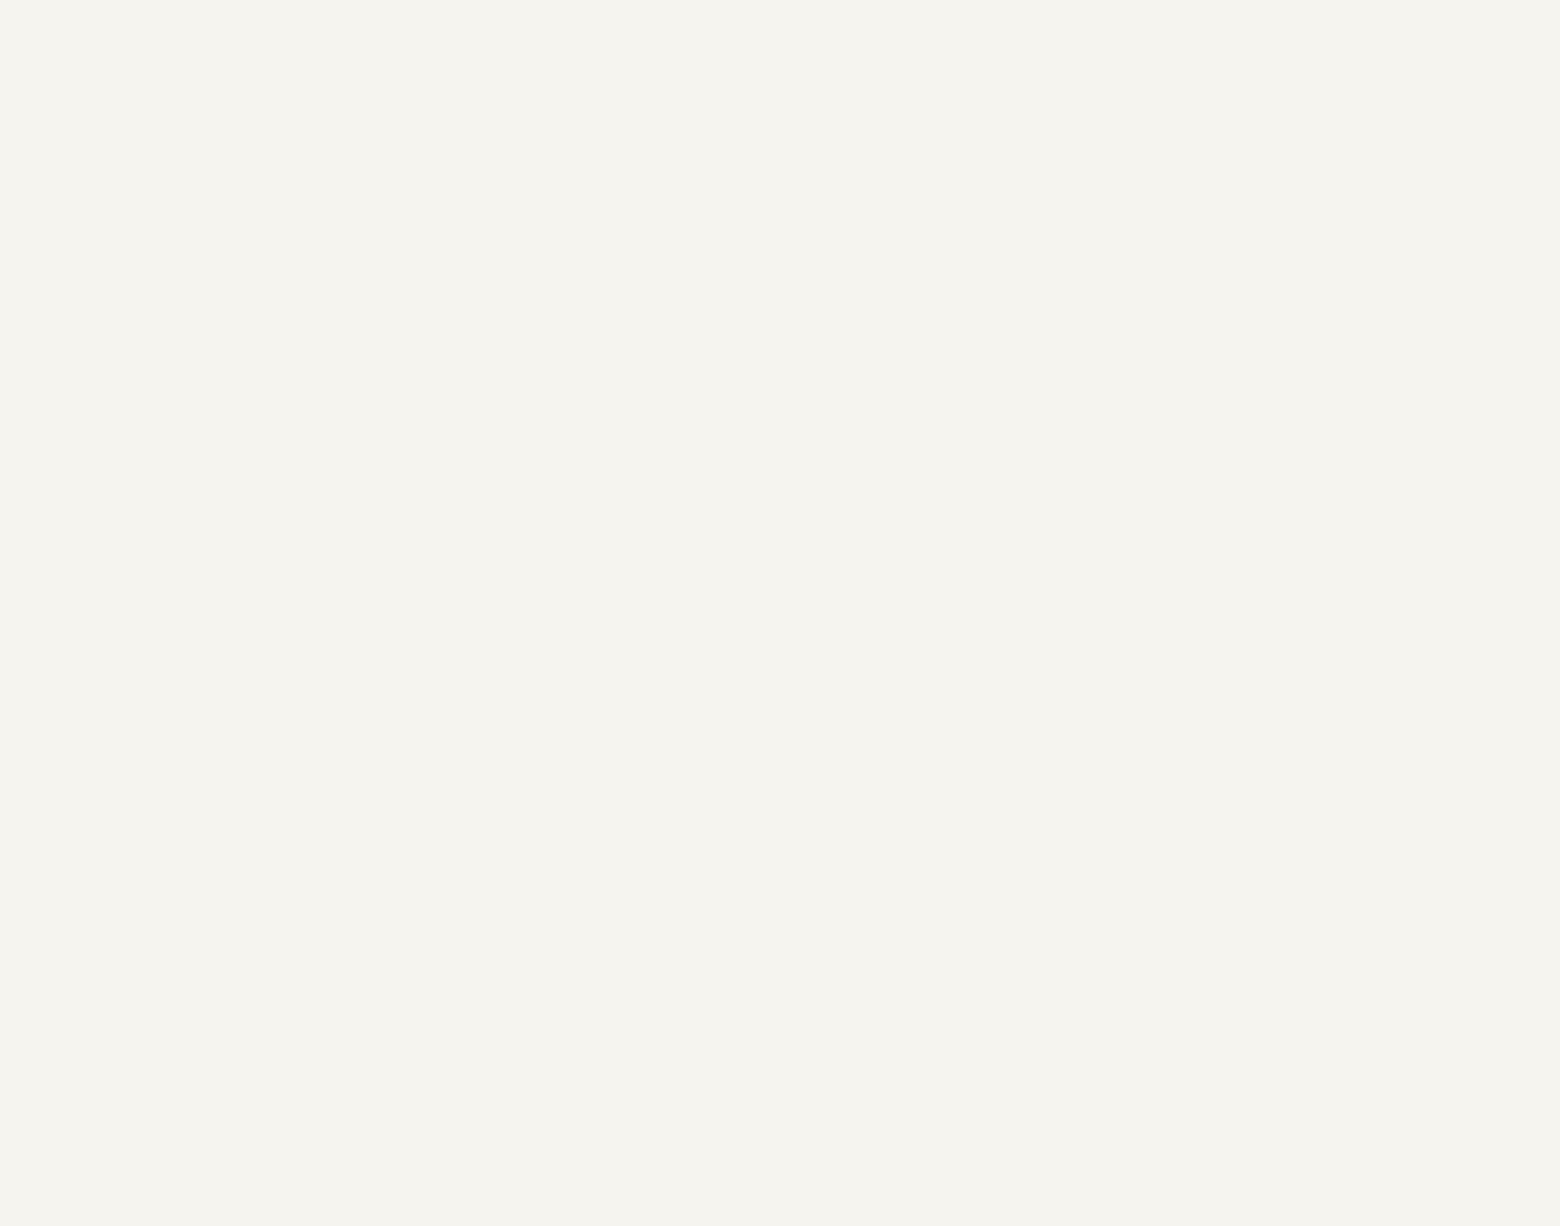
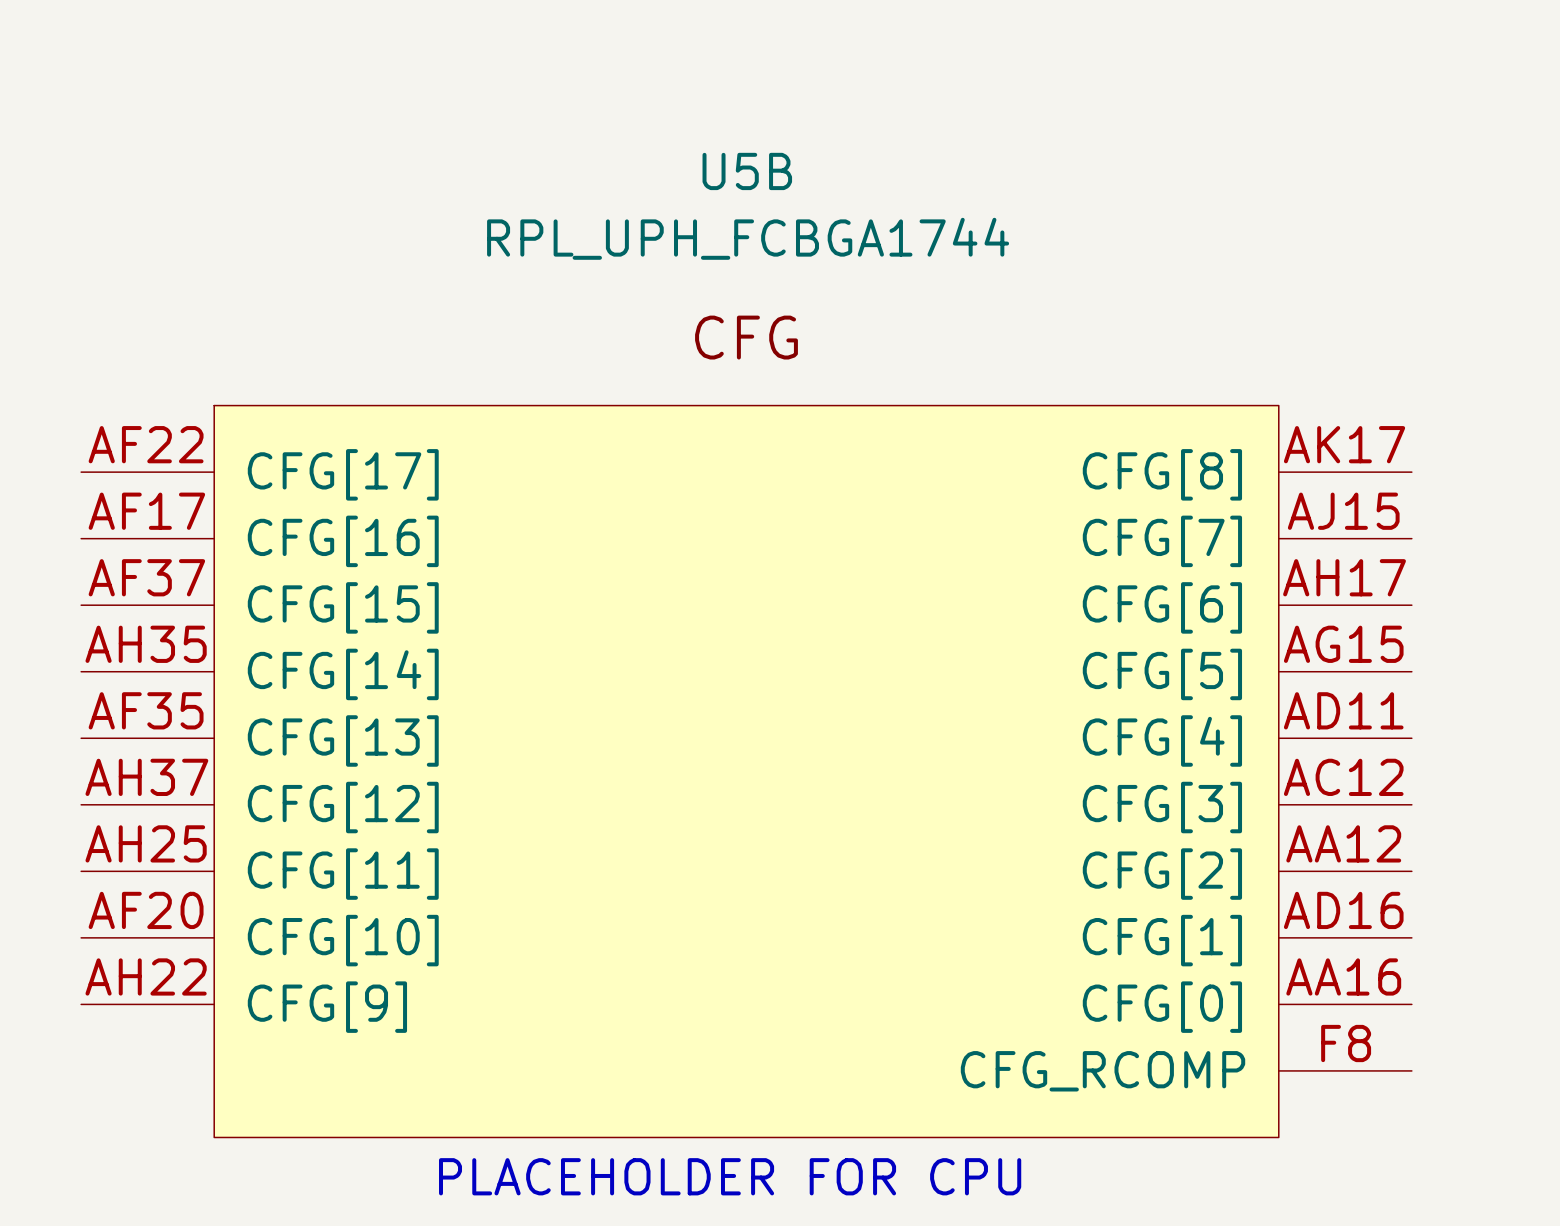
U5B: none -> RPL_UPH_FCBGA1744 (746, 771)
text: none -> PLACEHOLDER FOR CPU (730, 1176)

